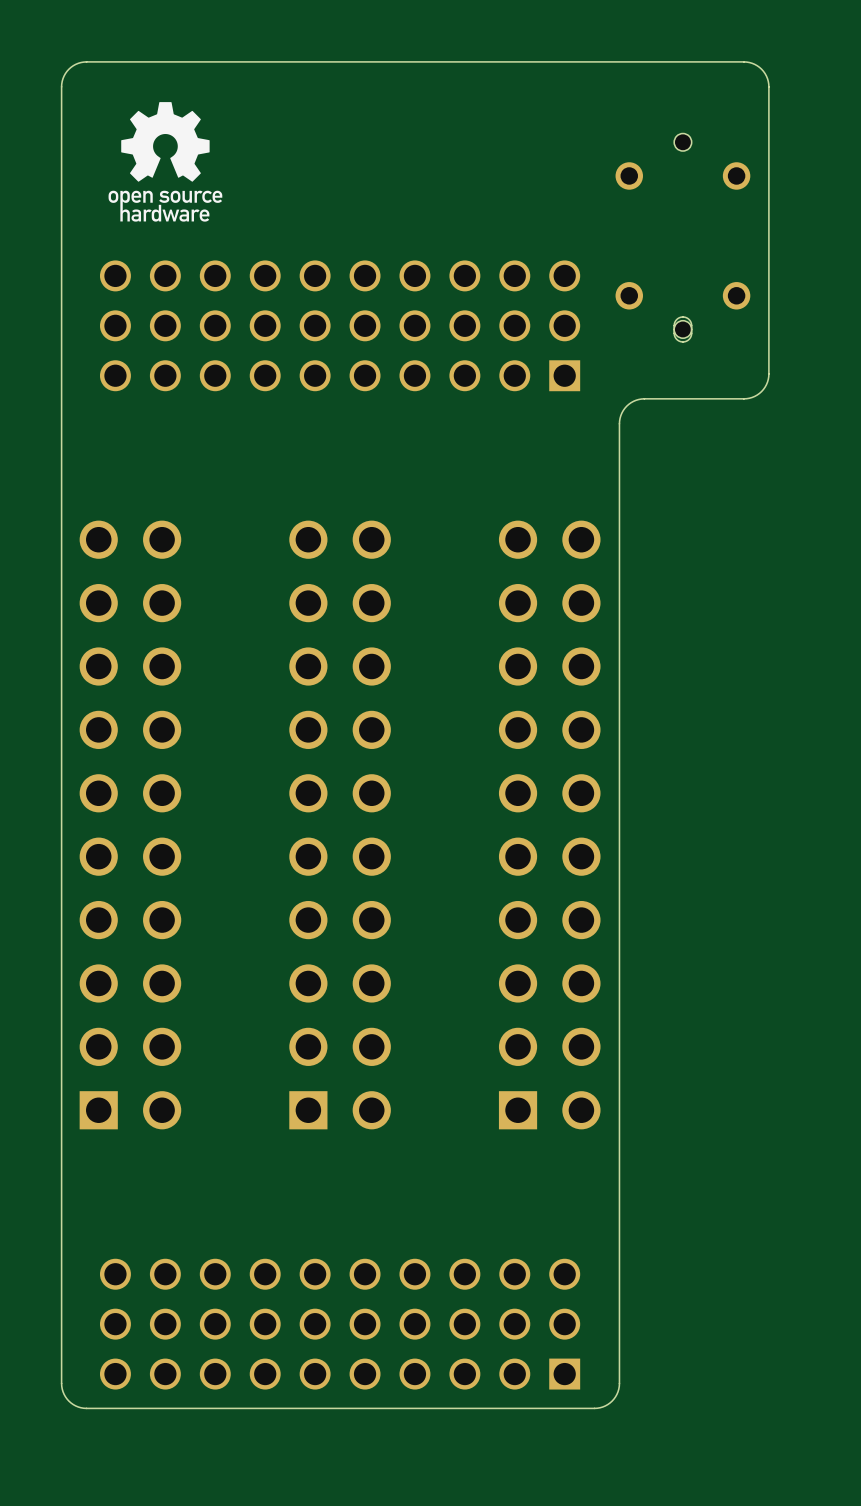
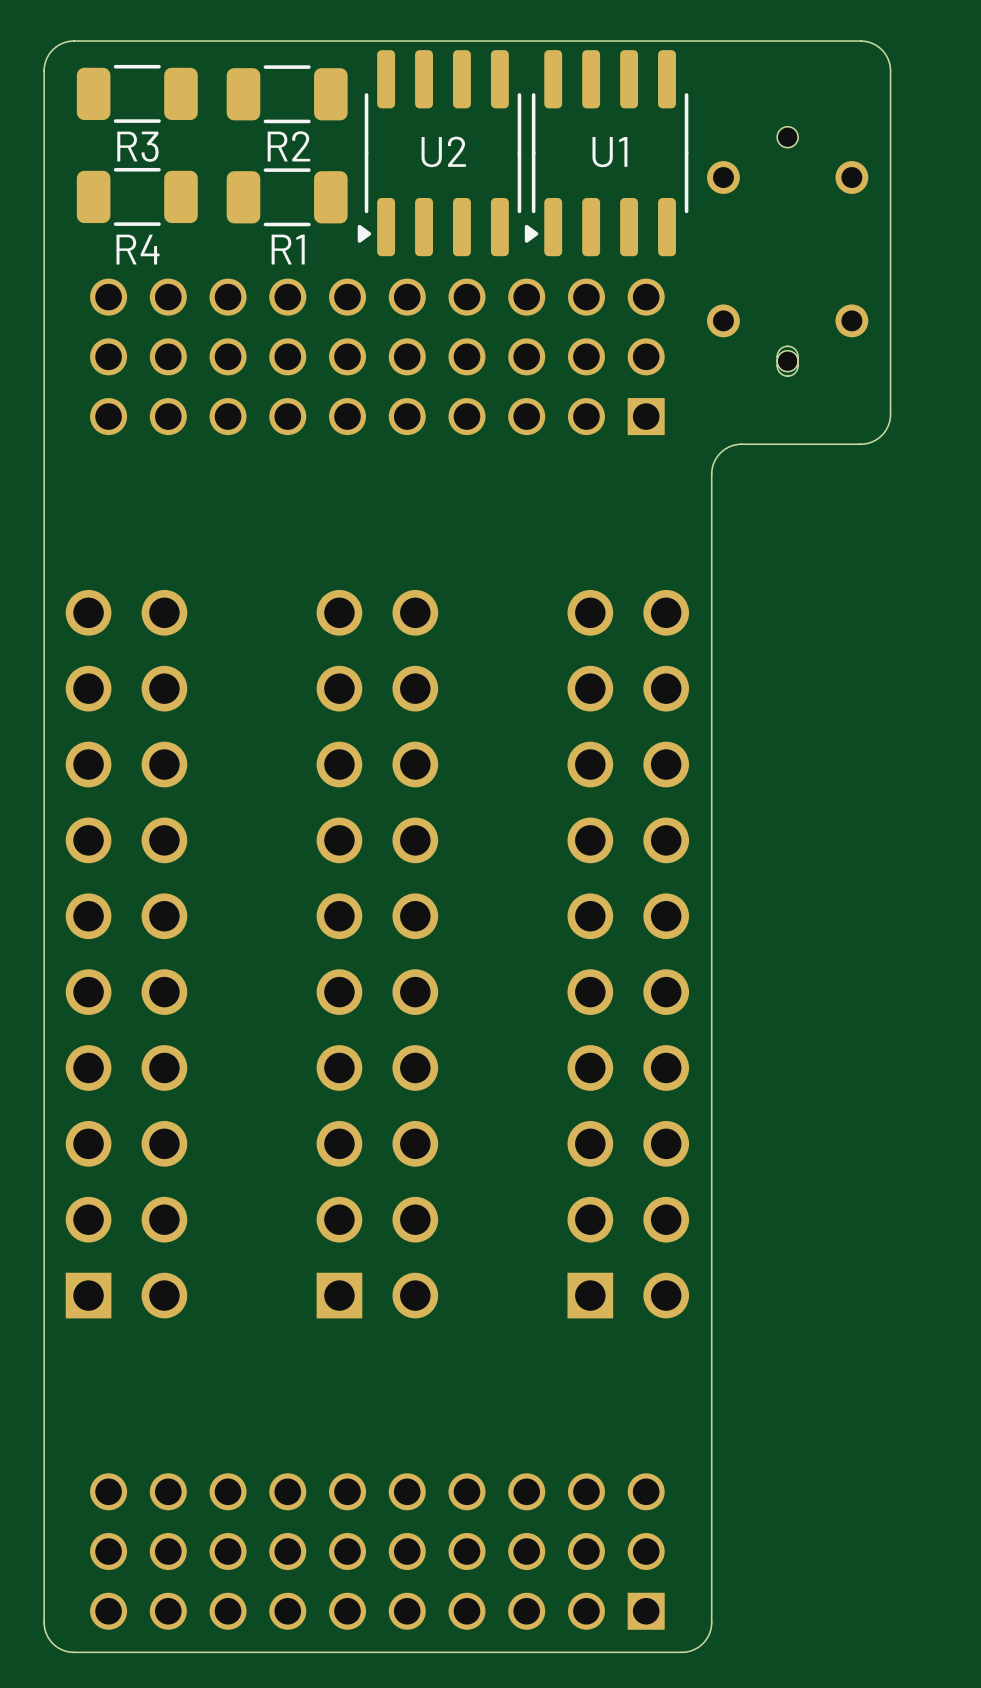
drawing: [108, 102, 223, 222] -> none
R3: none -> (137, 93)
R2: none -> (287, 94)
U2: none -> (439, 153)
U1: none -> (606, 153)
R4: none -> (137, 196)
R1: none -> (287, 197)

